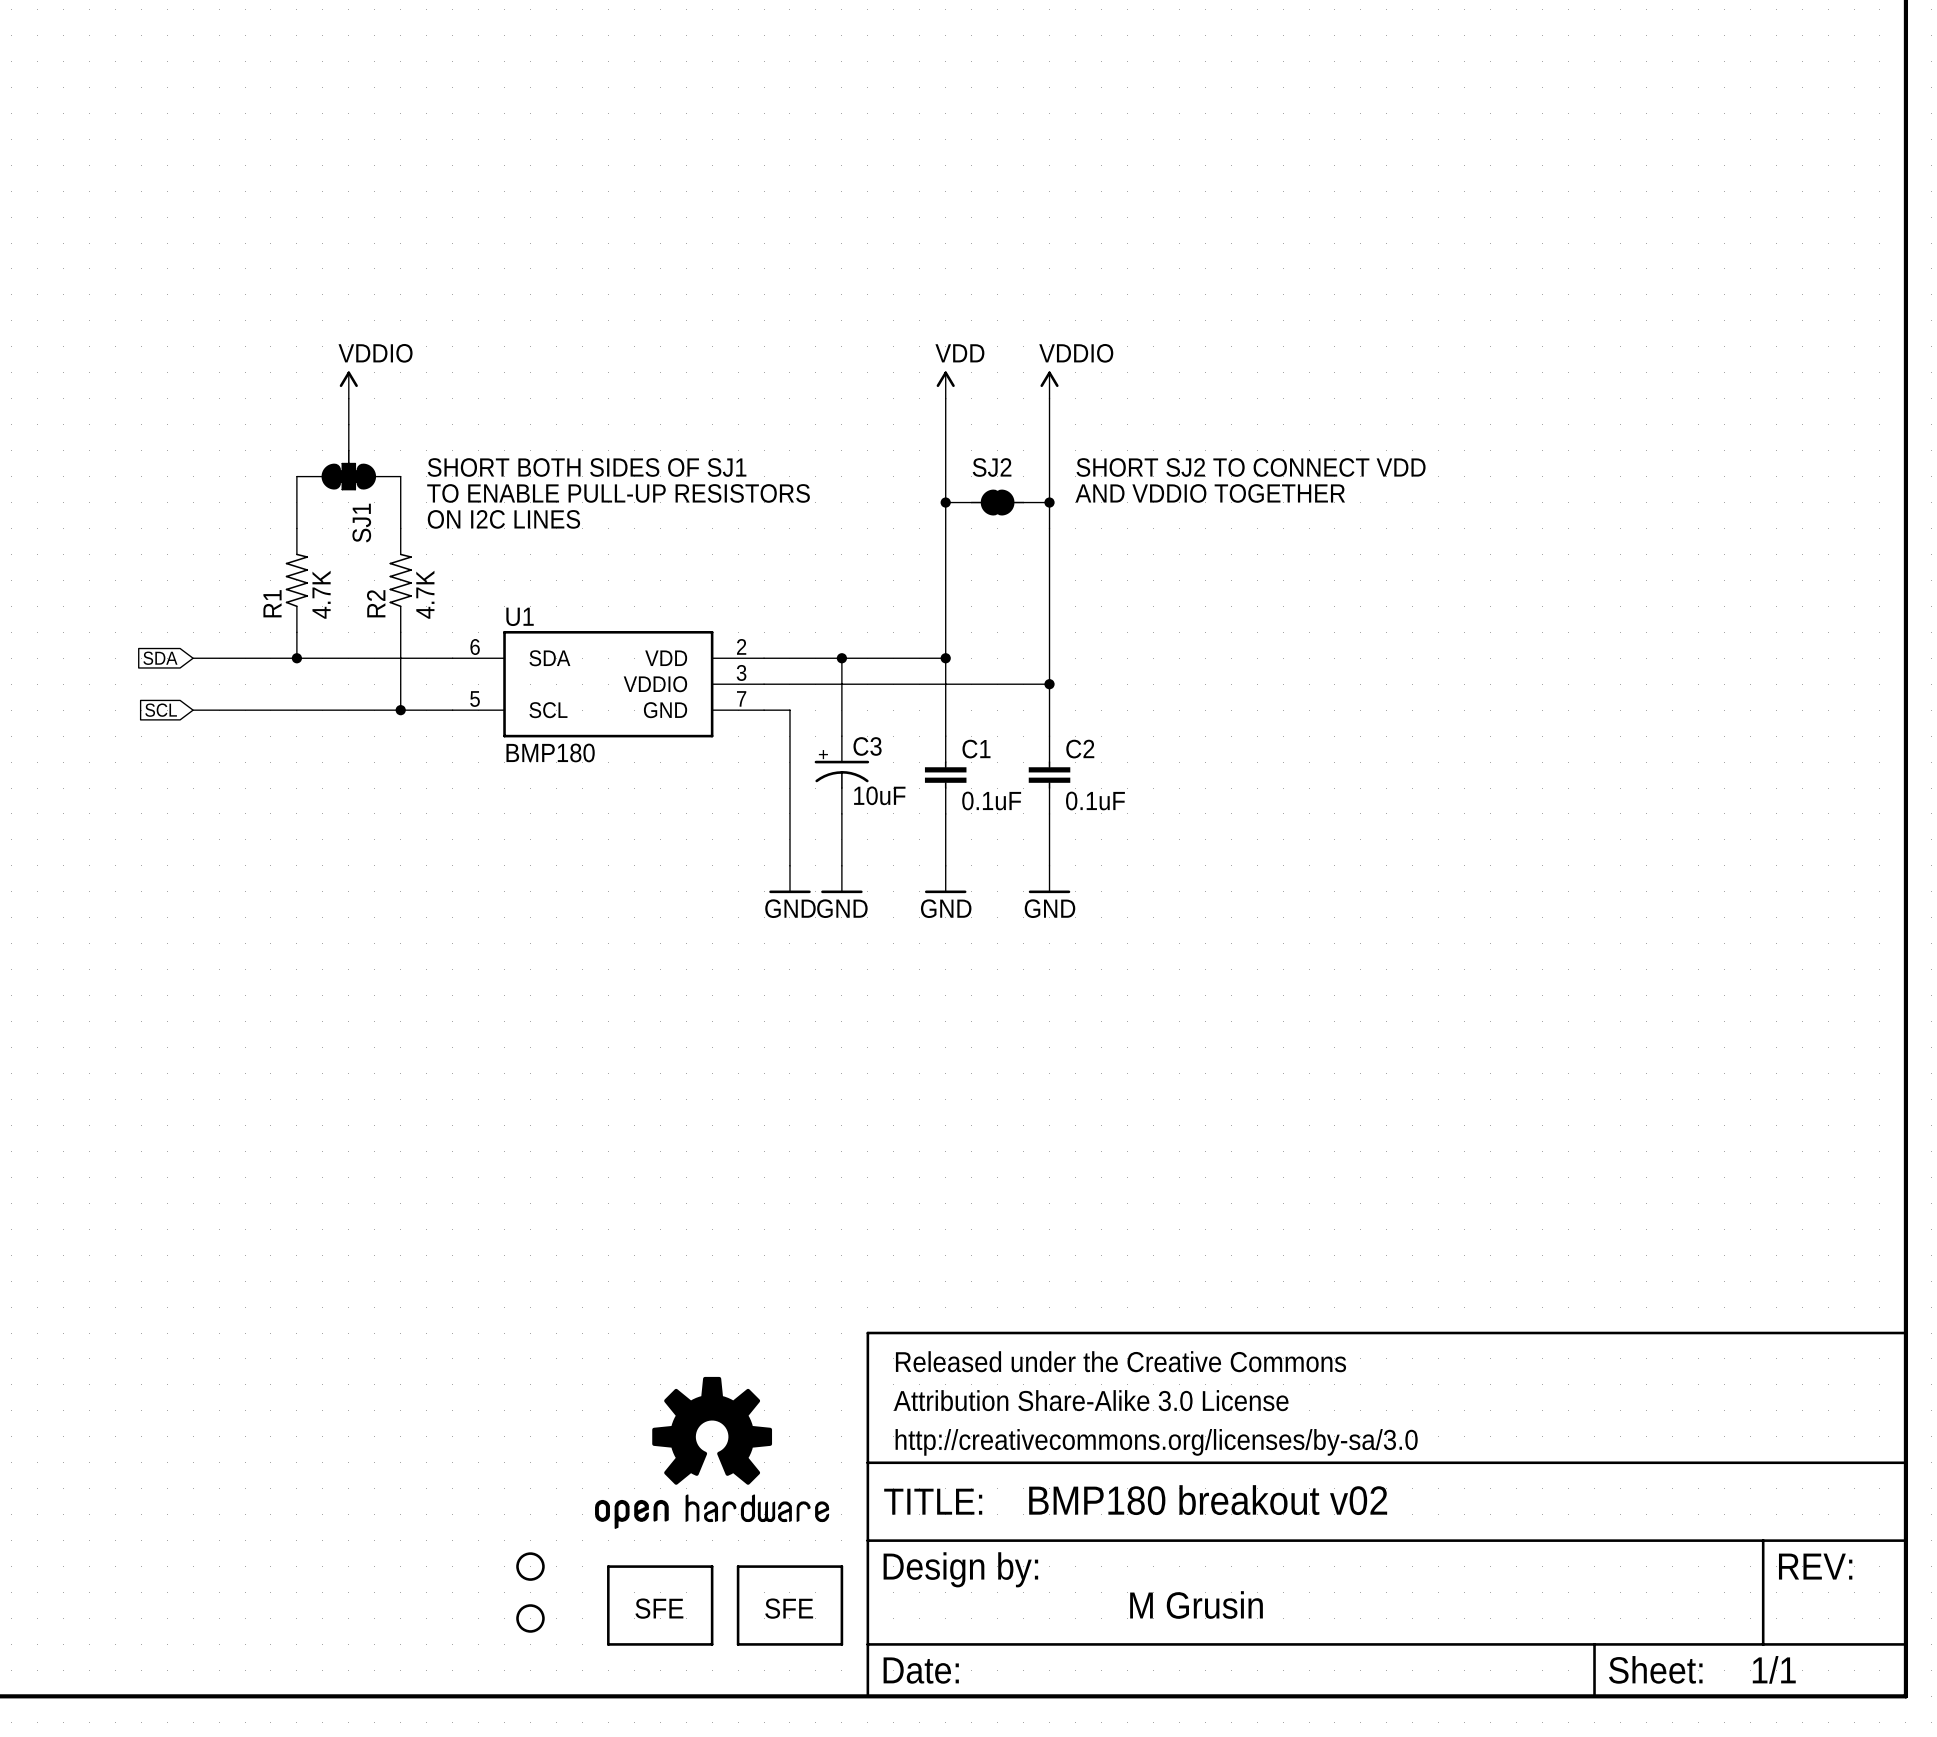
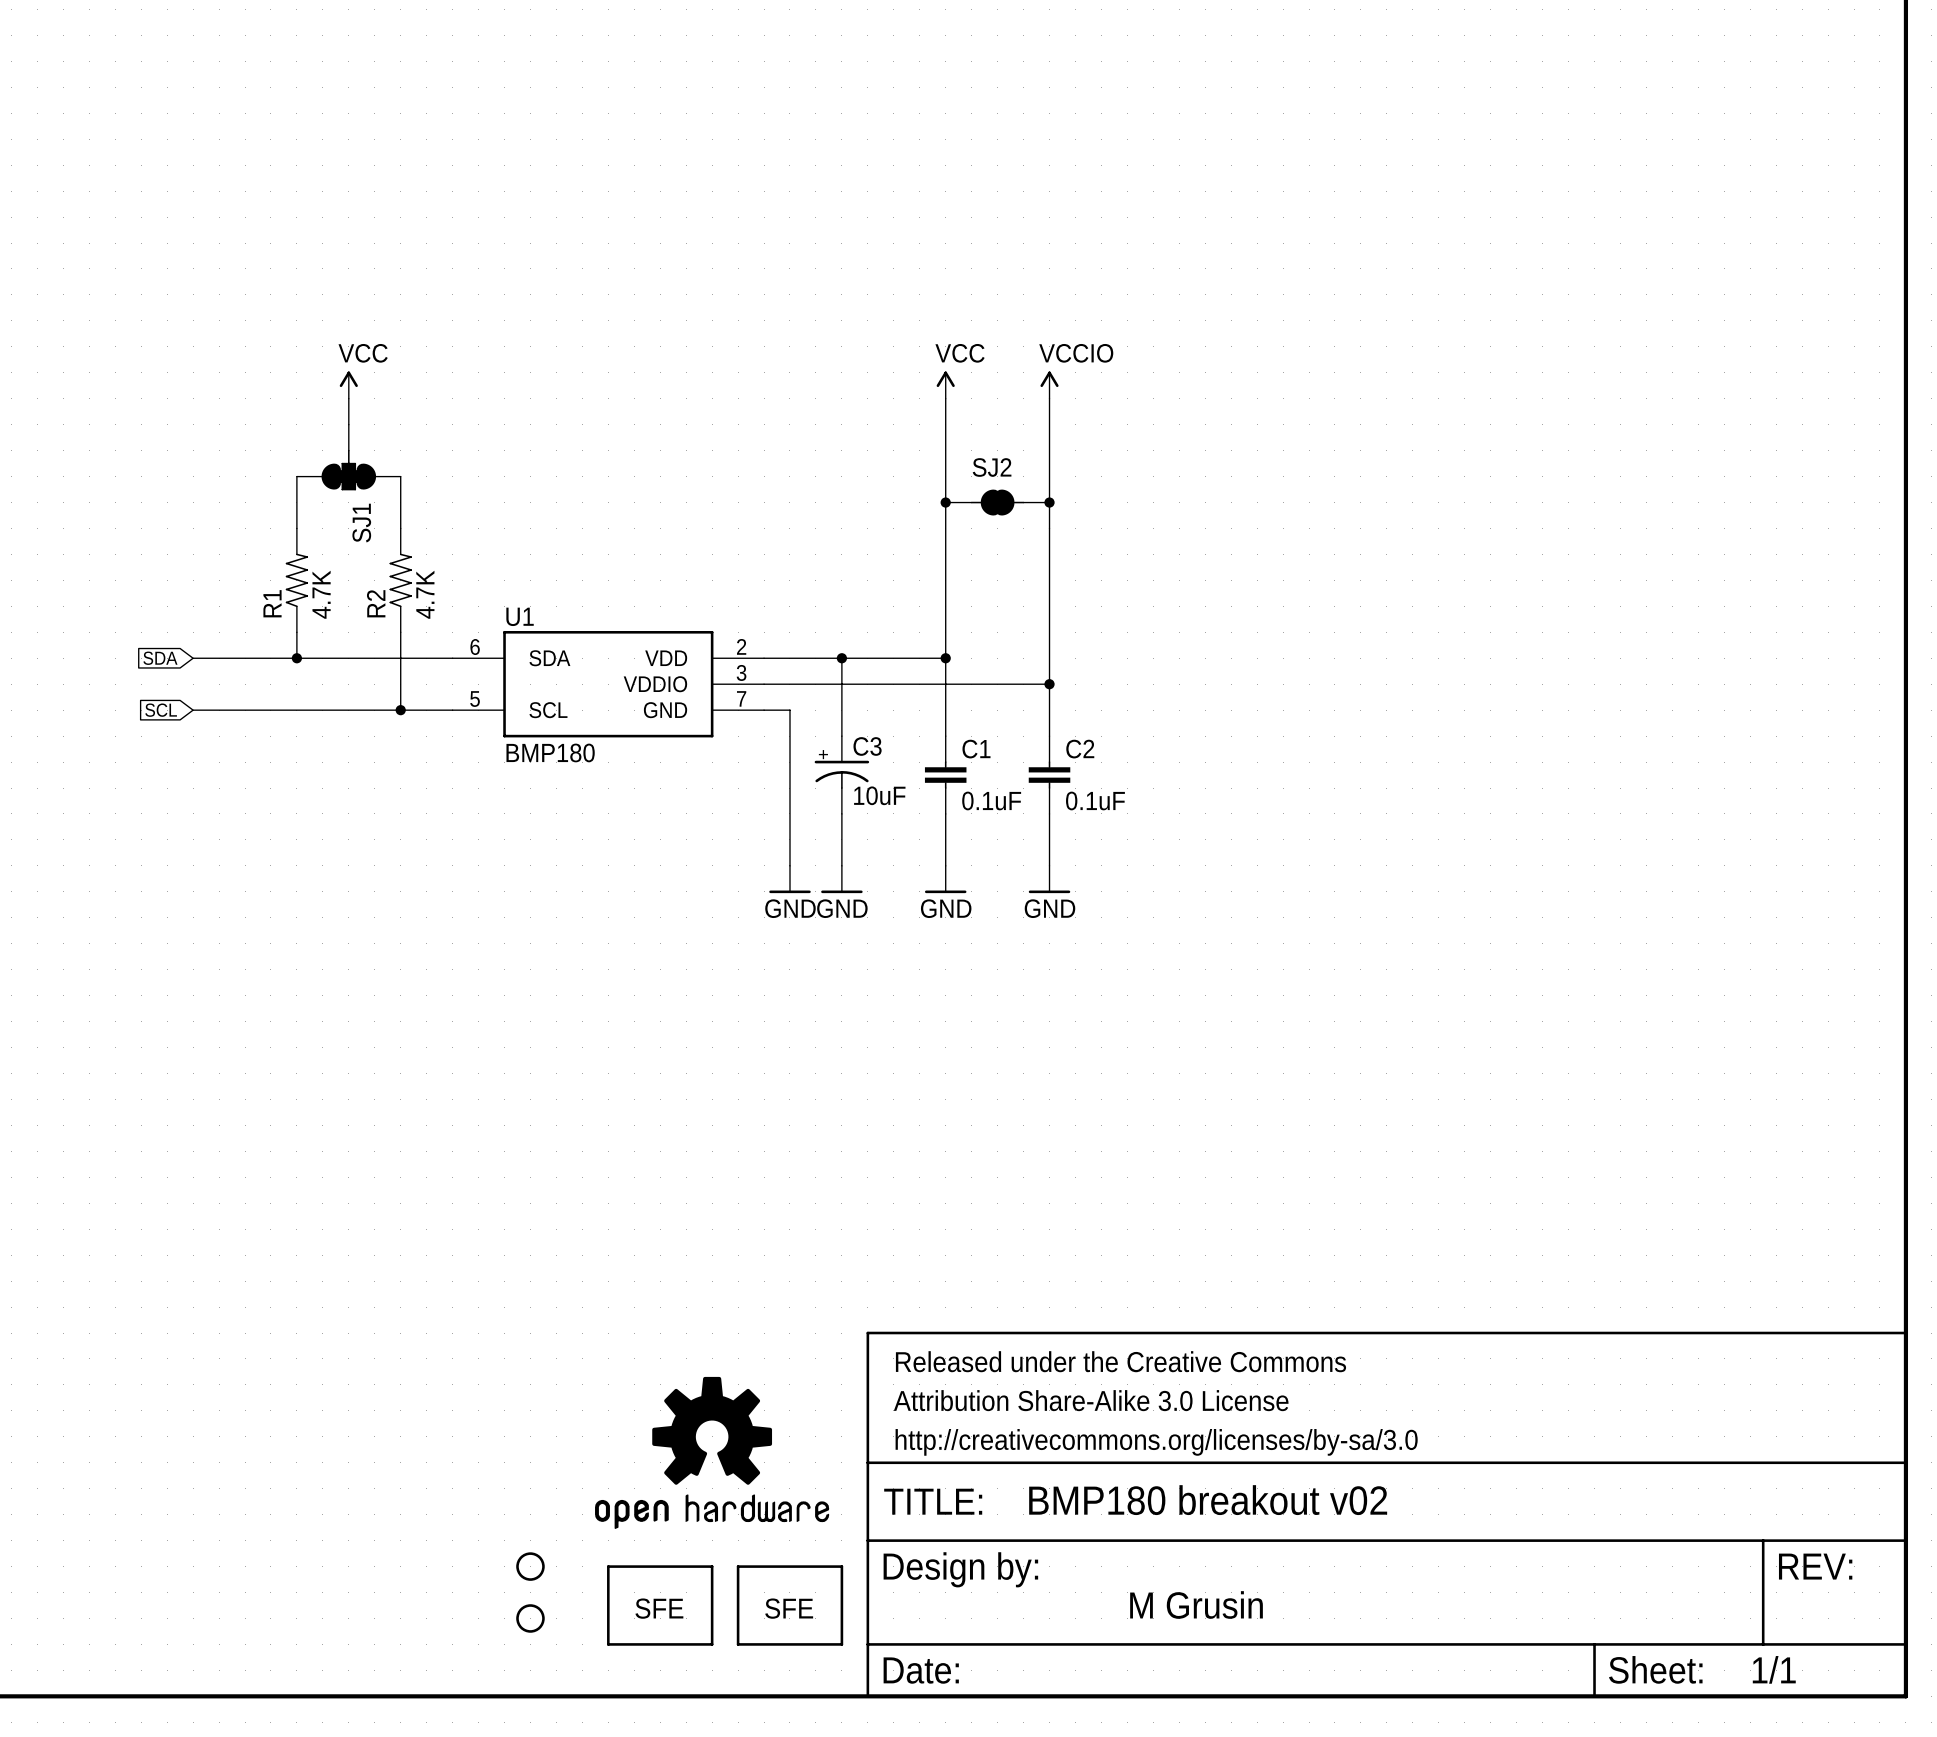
power symbol: VDDIO (348, 385) -> VCC (348, 385)
power symbol: VDD (945, 385) -> VCC (945, 385)
power symbol: VDDIO (1049, 385) -> VCCIO (1049, 385)
text: SHORT BOTH SIDES OF SJ1 (587, 467) -> none
text: SHORT SJ2 TO CONNECT VDD (1251, 467) -> none
text: TO ENABLE PULL-UP RESISTORS (618, 493) -> none
text: AND VDDIO TOGETHER (1210, 493) -> none
text: ON I2C LINES (503, 519) -> none

